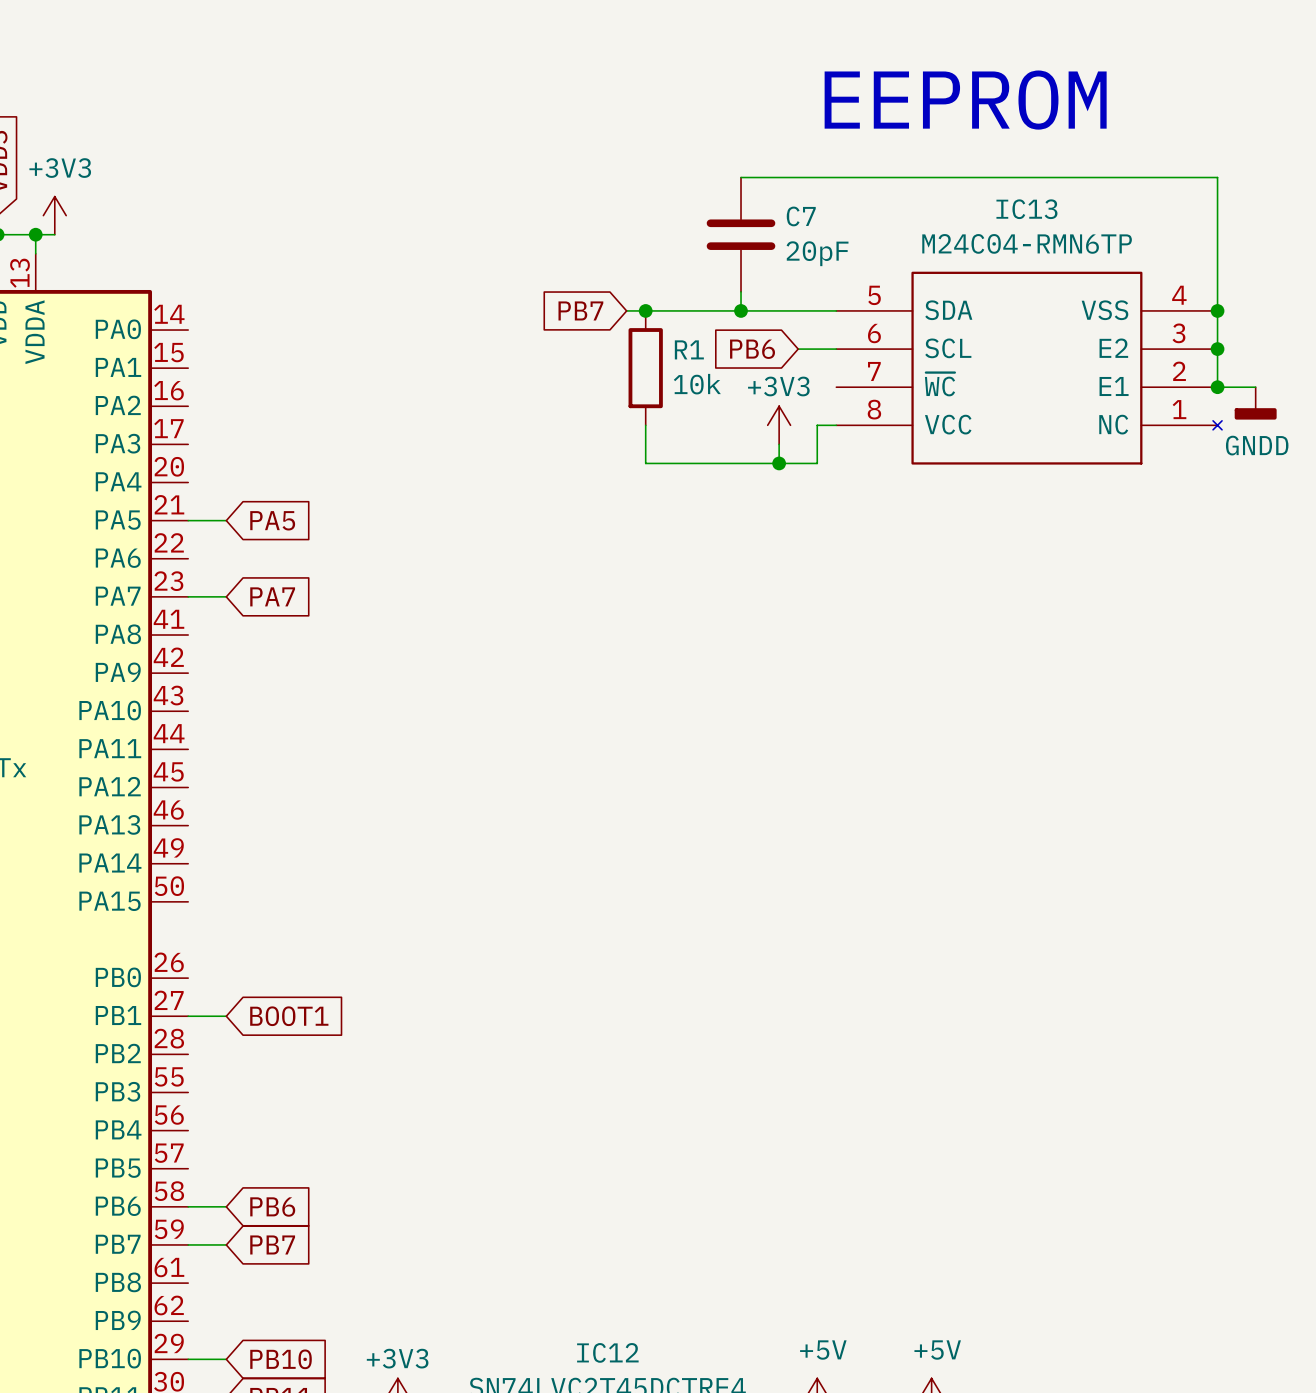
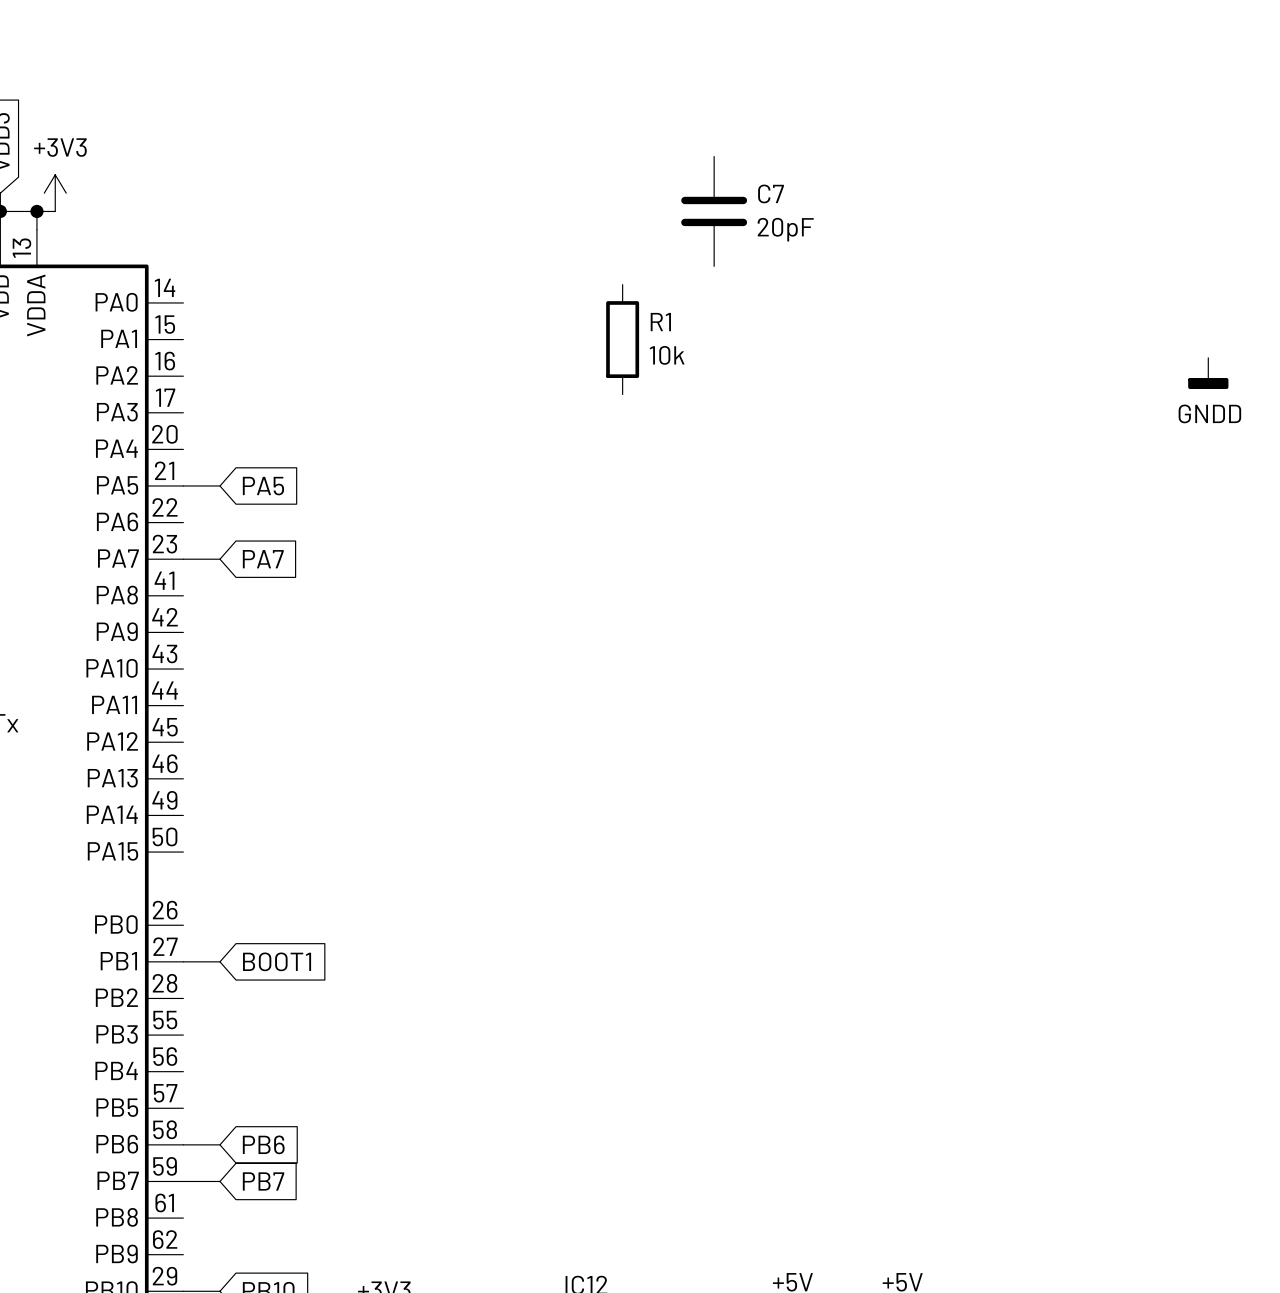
text: EEPROM (965, 100) -> none
wire: (741, 177) (1217, 177) (1217, 387) (1255, 387) -> none
wire: (741, 291) (741, 310) -> none
global label: PB7 (580, 310) -> none
wire: (626, 310) (836, 310) -> none
junction: (645, 310) -> none
junction: (741, 310) -> none
junction: (1217, 310) -> none
global label: PB6 (752, 349) -> none
wire: (798, 349) (836, 349) -> none
junction: (1217, 349) -> none
IC13: M24C04-RMN6TP (1029, 368) -> none
junction: (1217, 387) -> none
wire: (645, 425) (645, 463) (817, 463) (817, 425) (836, 425) -> none
power symbol: +3V3 (779, 425) -> none
wire: (779, 444) (779, 463) -> none
junction: (779, 463) -> none

